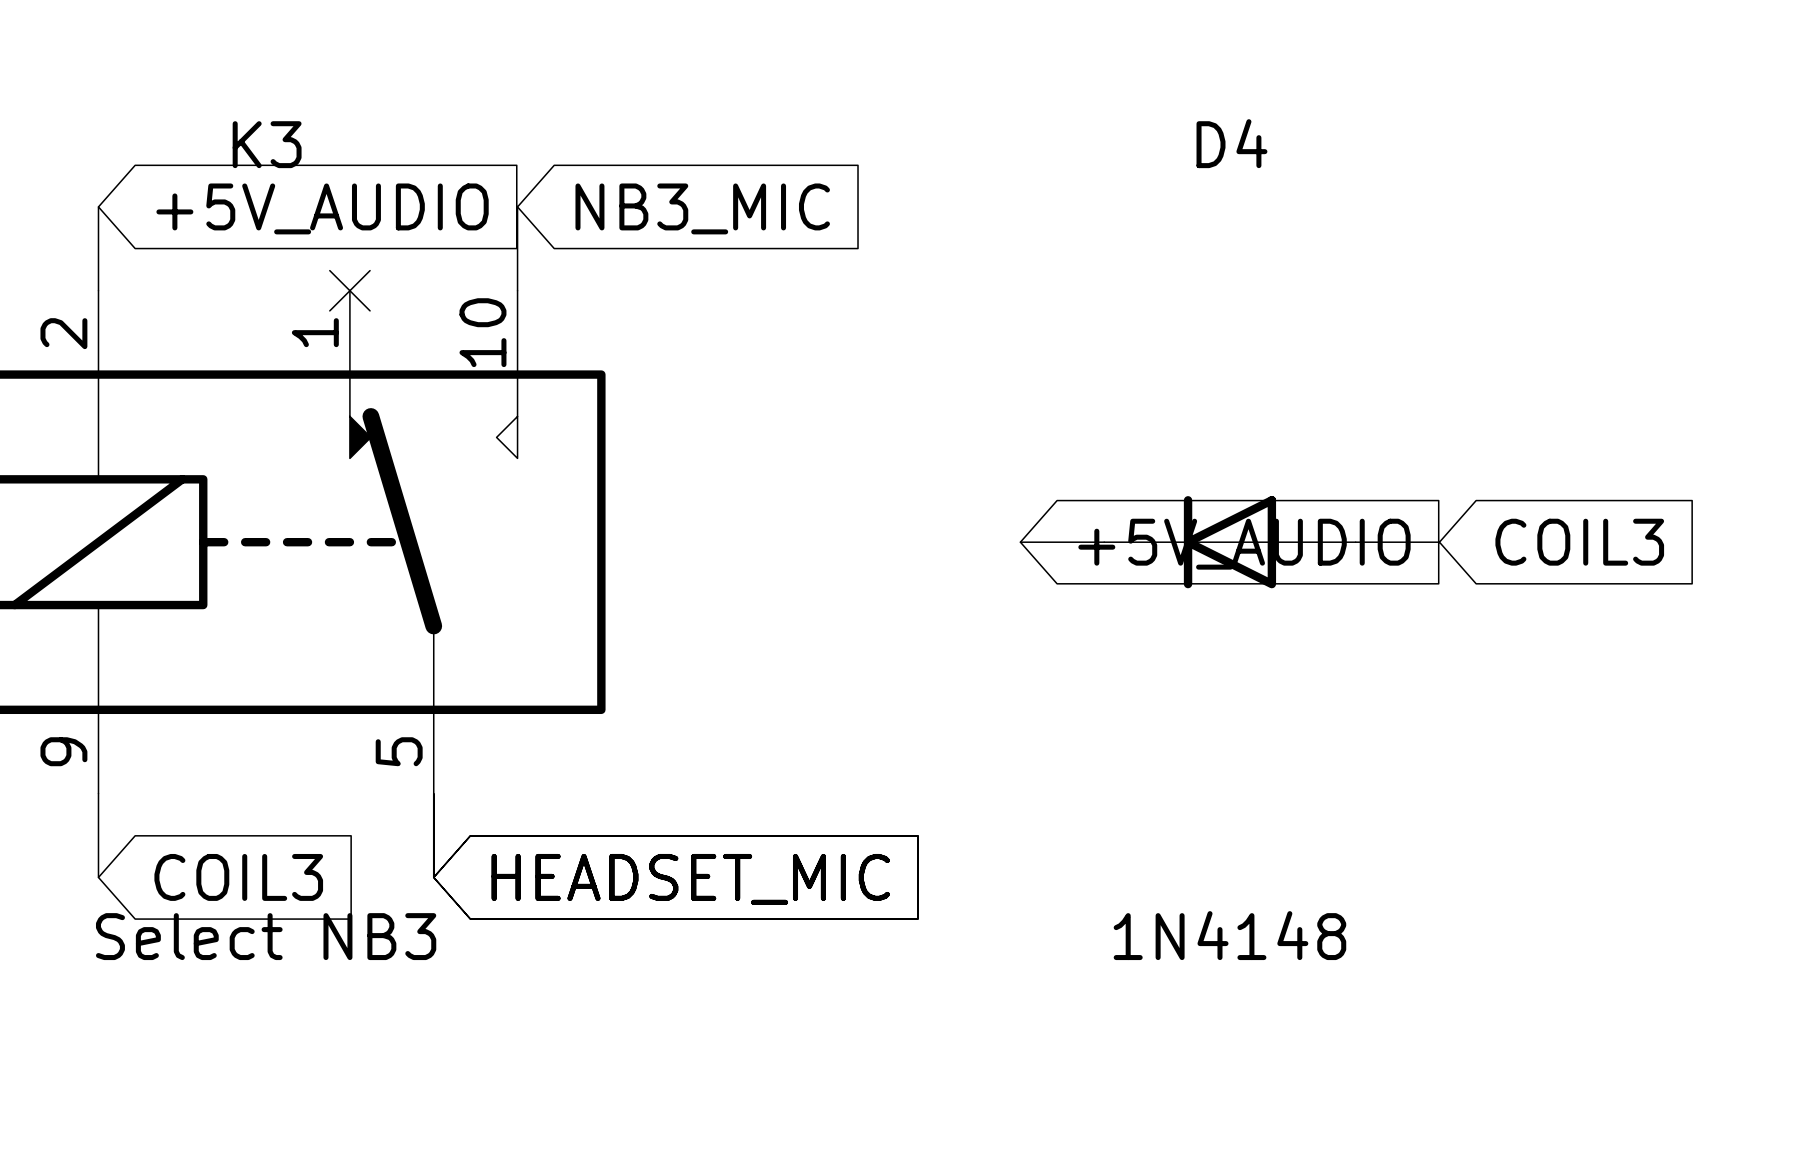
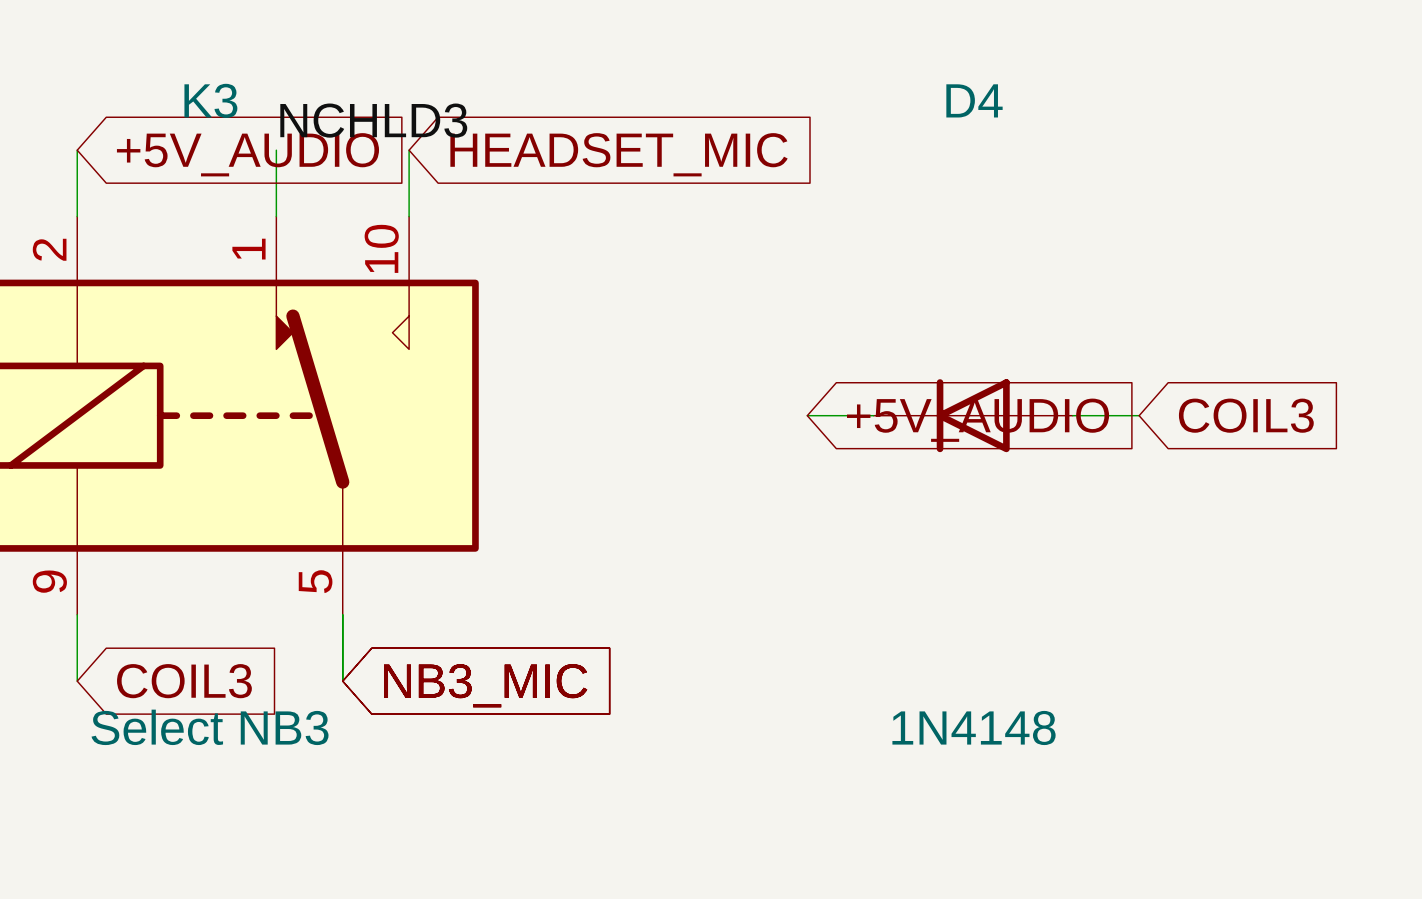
label: none -> NCHLD3 (373, 120)
wire: none -> (276, 150) (276, 216)
global label: NB3_MIC (702, 208) -> HEADSET_MIC (619, 154)
no-connect mark: (349, 290) -> none
global label: HEADSET_MIC (690, 879) -> NB3_MIC (485, 685)

